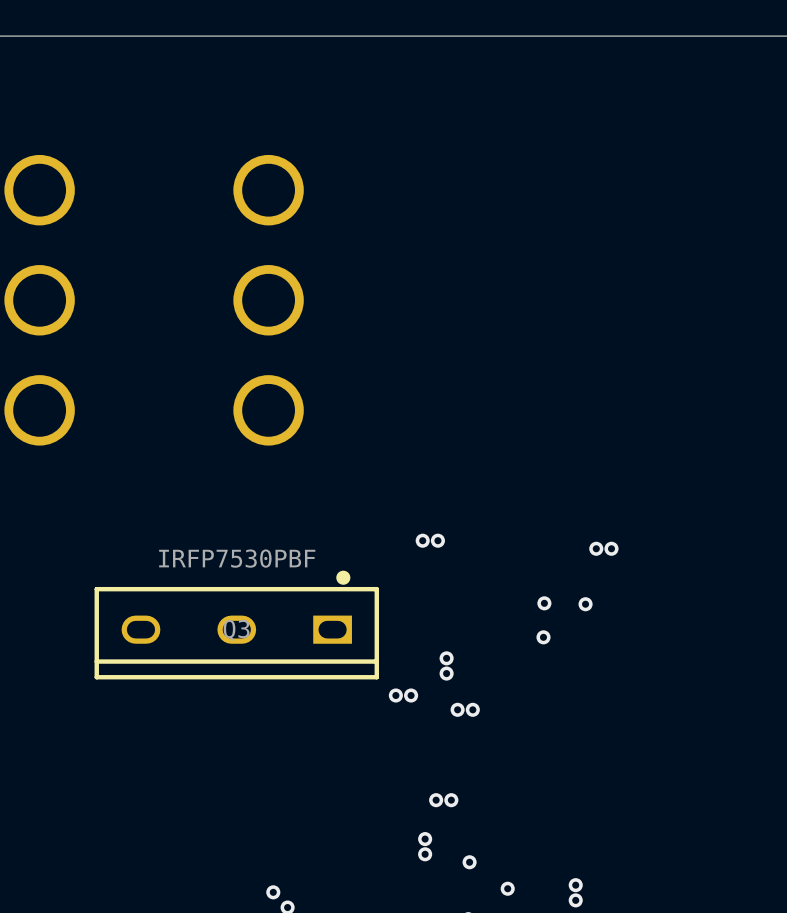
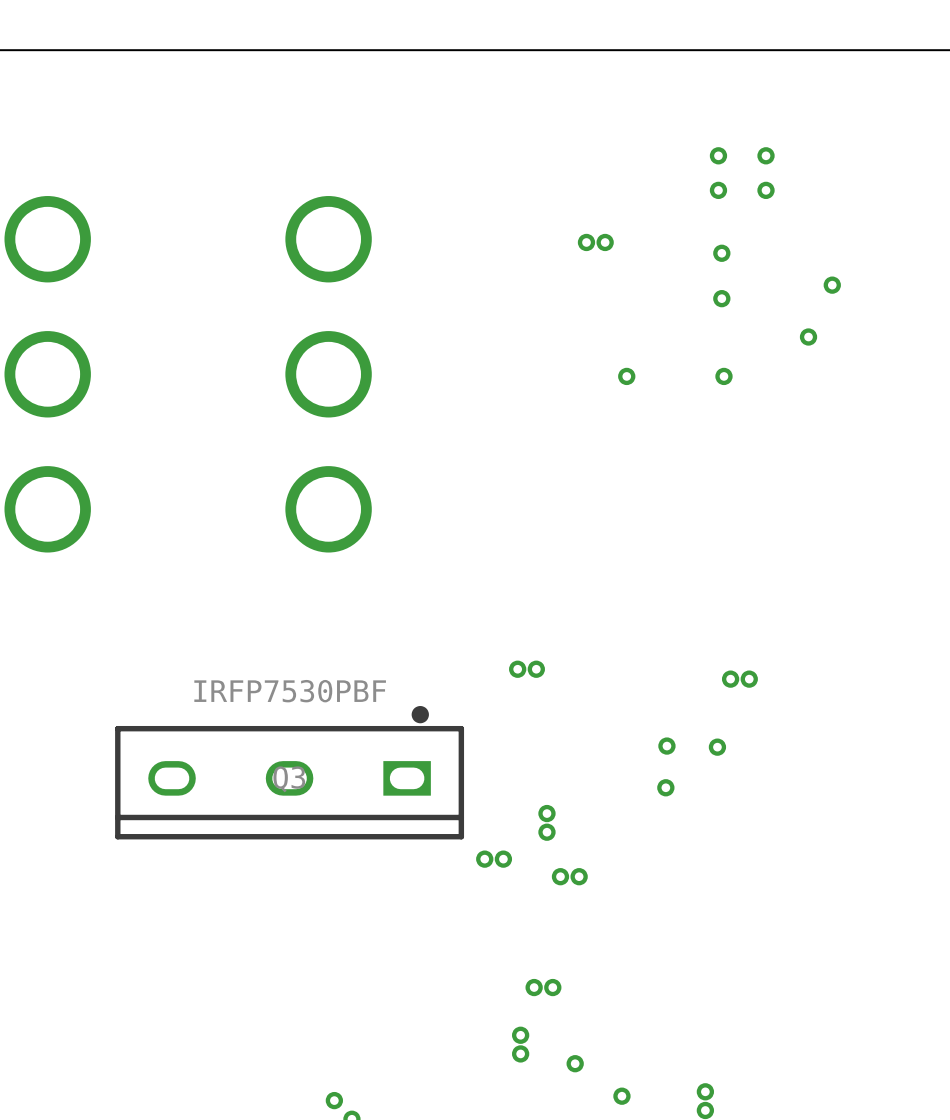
via: none -> (718, 155)
via: none -> (766, 155)
via: none -> (718, 190)
via: none -> (766, 190)
via: none -> (586, 242)
via: none -> (605, 242)
via: none -> (721, 253)
via: none -> (832, 285)
via: none -> (721, 298)
via: none -> (808, 337)
via: none -> (626, 376)
via: none -> (723, 376)

